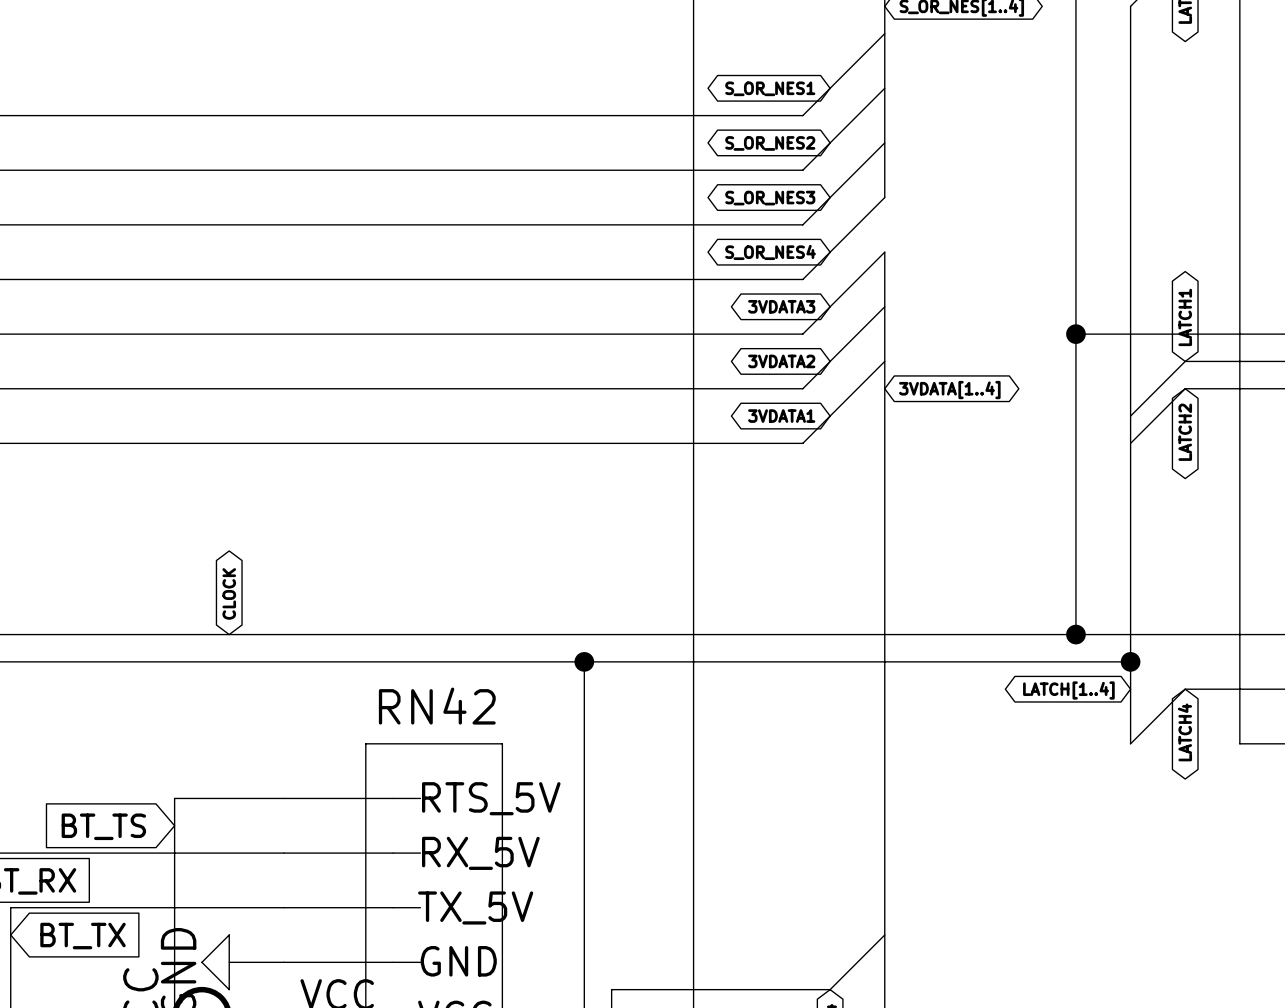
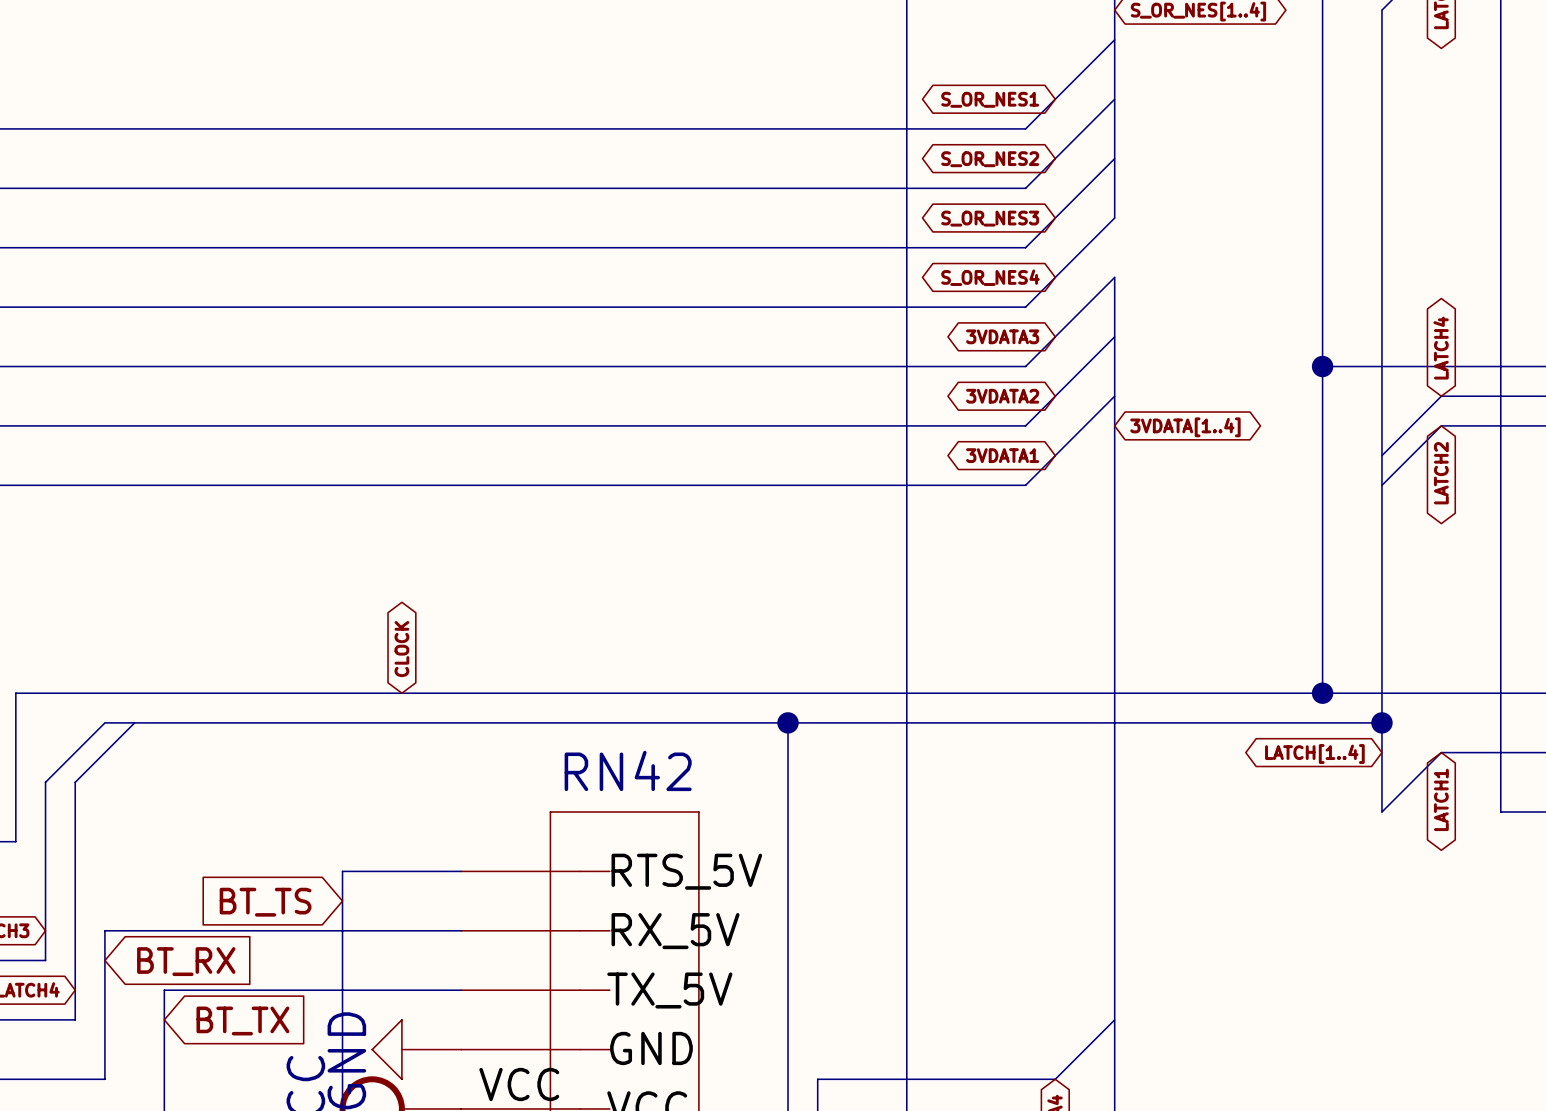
global label: LATCH1 (1185, 317) -> LATCH4 (1441, 348)
global label: LATCH4 (1184, 732) -> LATCH1 (1441, 799)

